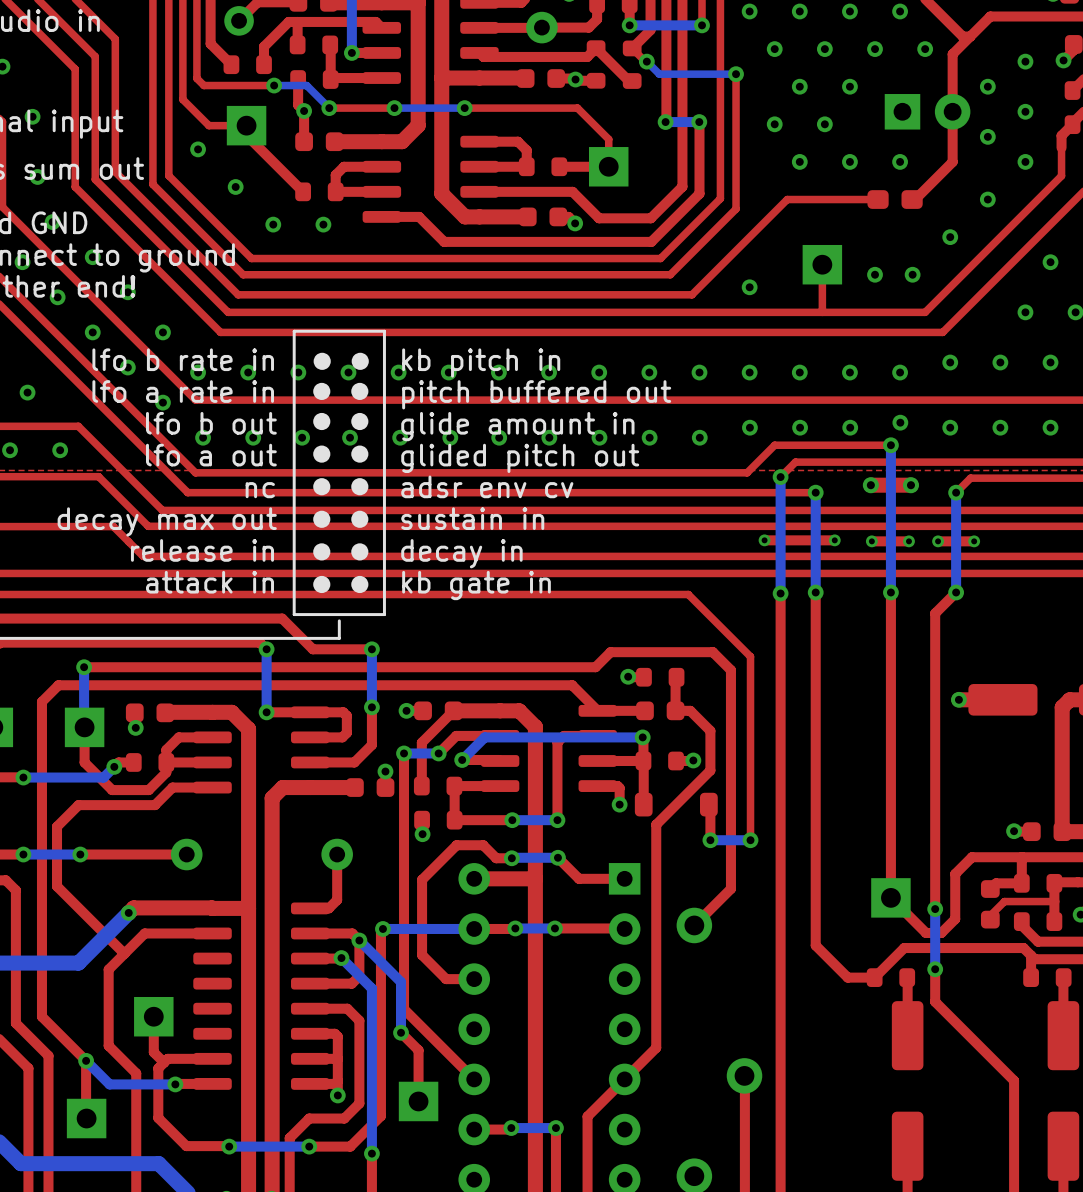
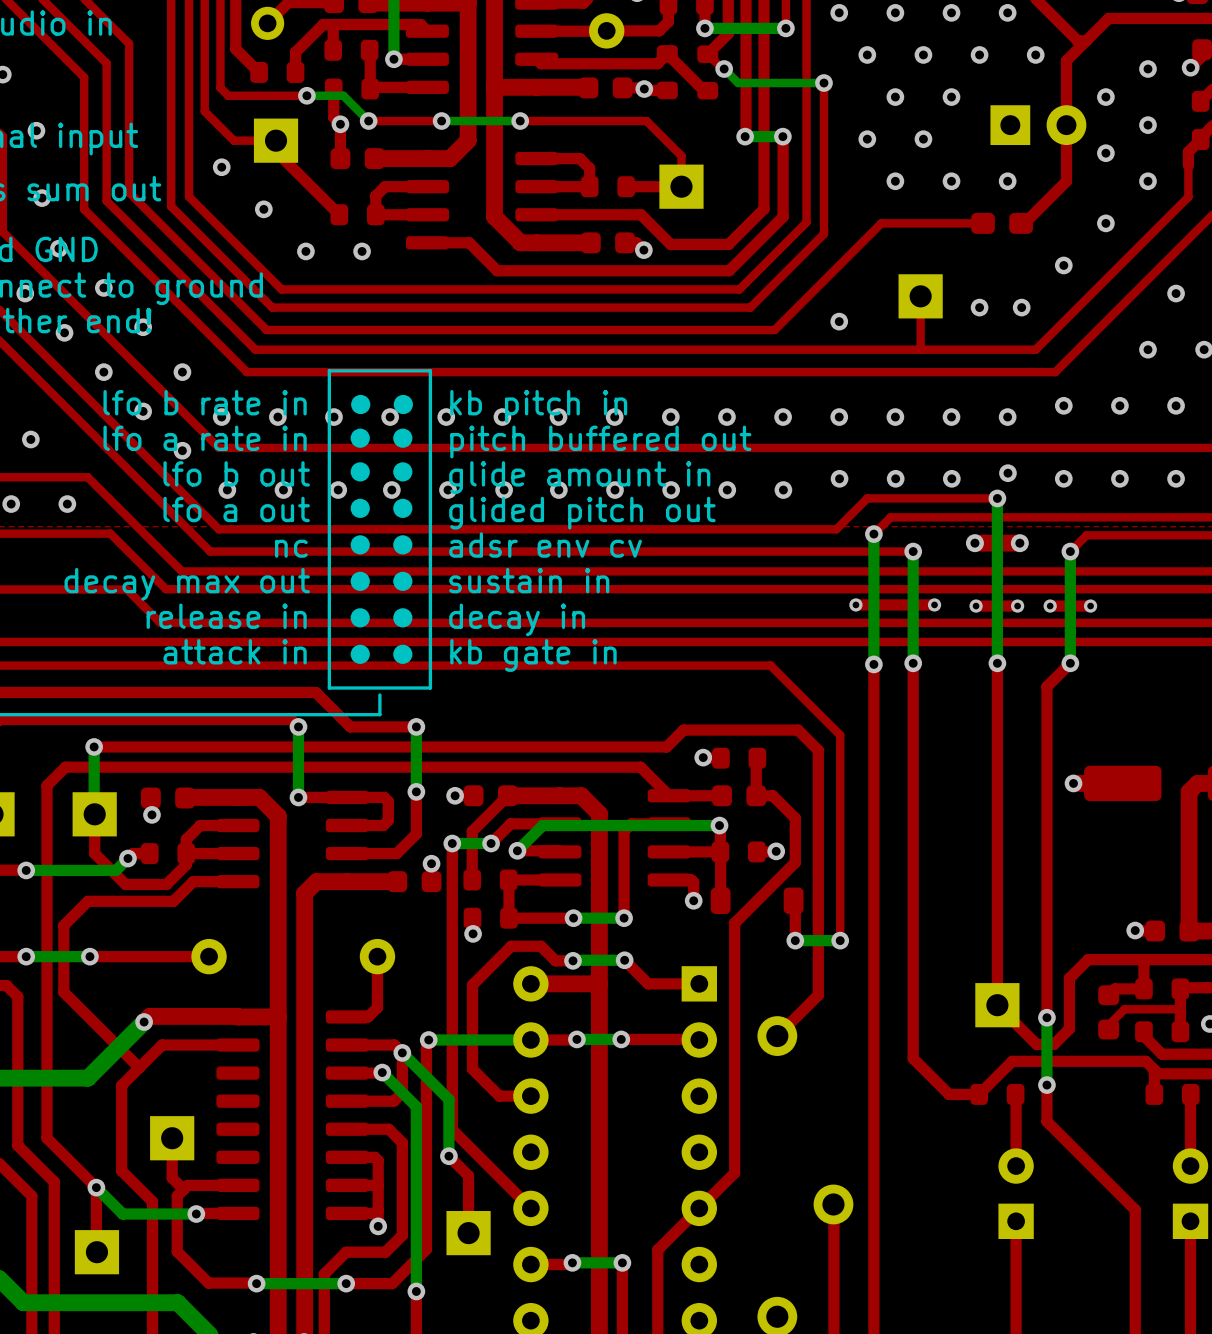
part: none -> (1016, 1193)
part: none -> (1190, 1193)
top track: none -> (1016, 1221) (1016, 1283)
part: (907, 1090) -> none
top track: none -> (1190, 1221) (1190, 1283)
part: (1063, 1090) -> none

